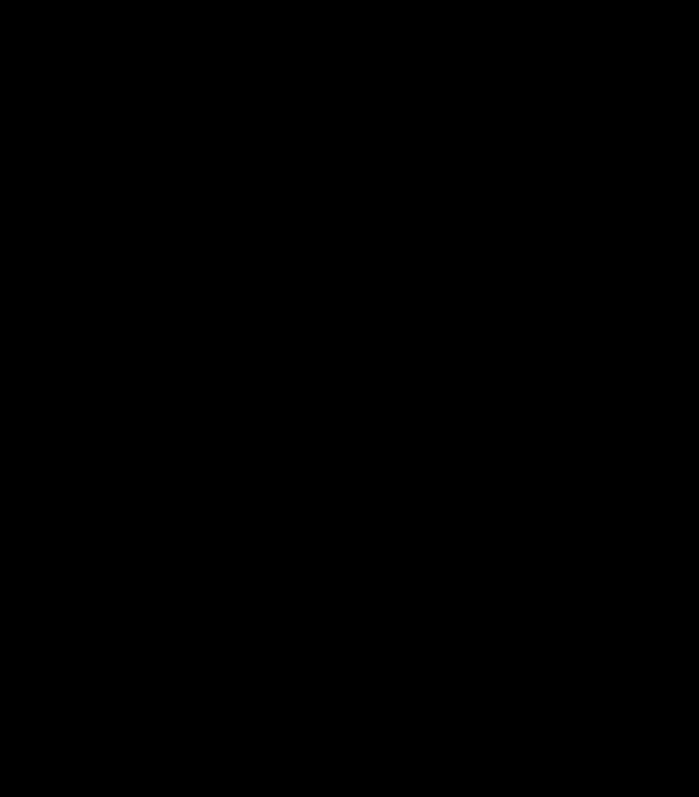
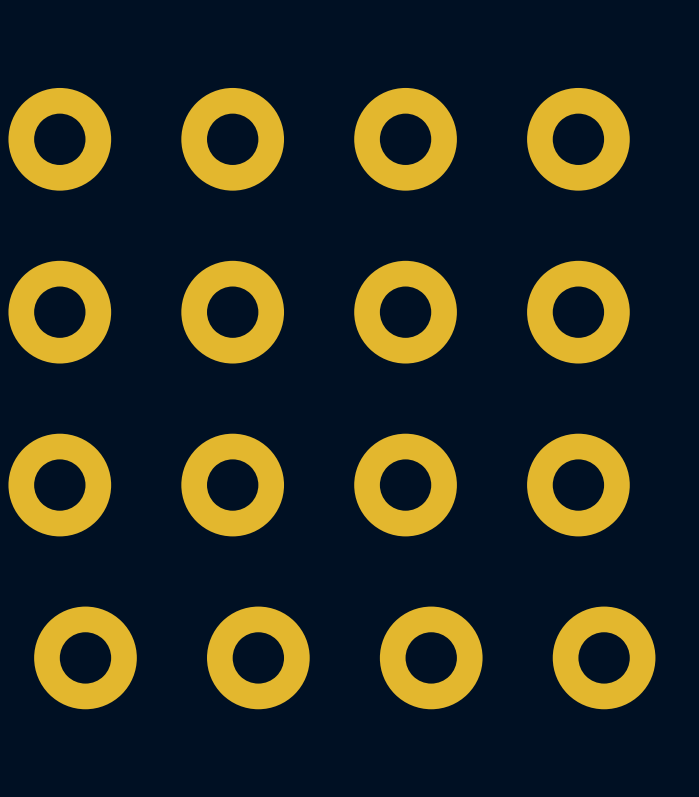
part: none -> (59, 139)
part: none -> (232, 139)
part: none -> (405, 139)
part: none -> (578, 139)
part: none -> (59, 312)
part: none -> (232, 312)
part: none -> (405, 312)
part: none -> (578, 312)
part: none -> (59, 485)
part: none -> (232, 485)
part: none -> (405, 485)
part: none -> (578, 485)
part: none -> (85, 657)
part: none -> (258, 657)
part: none -> (431, 657)
part: none -> (604, 657)

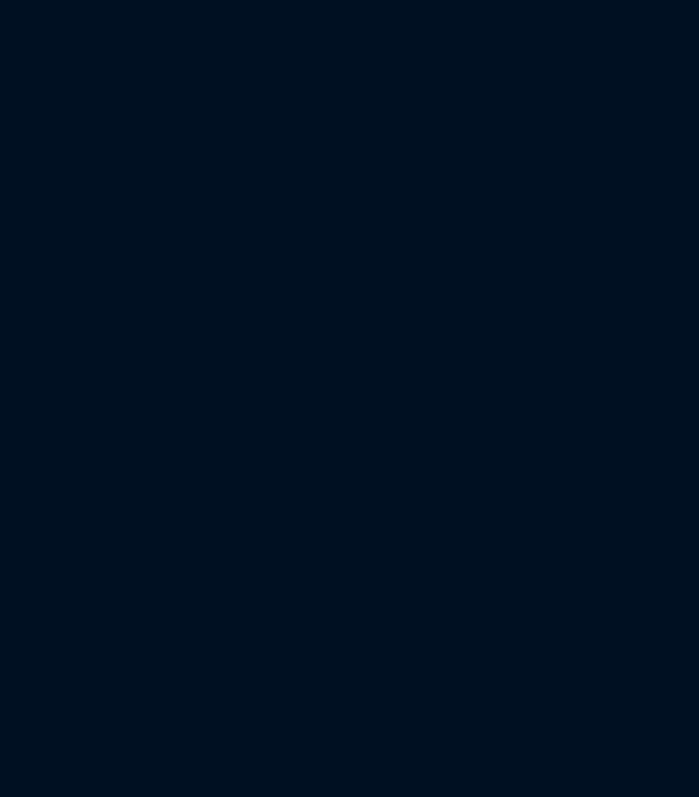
part: (59, 139) -> none
part: (232, 139) -> none
part: (405, 139) -> none
part: (578, 139) -> none
part: (59, 312) -> none
part: (232, 312) -> none
part: (405, 312) -> none
part: (578, 312) -> none
part: (59, 485) -> none
part: (232, 485) -> none
part: (405, 485) -> none
part: (578, 485) -> none
part: (85, 657) -> none
part: (258, 657) -> none
part: (431, 657) -> none
part: (604, 657) -> none

